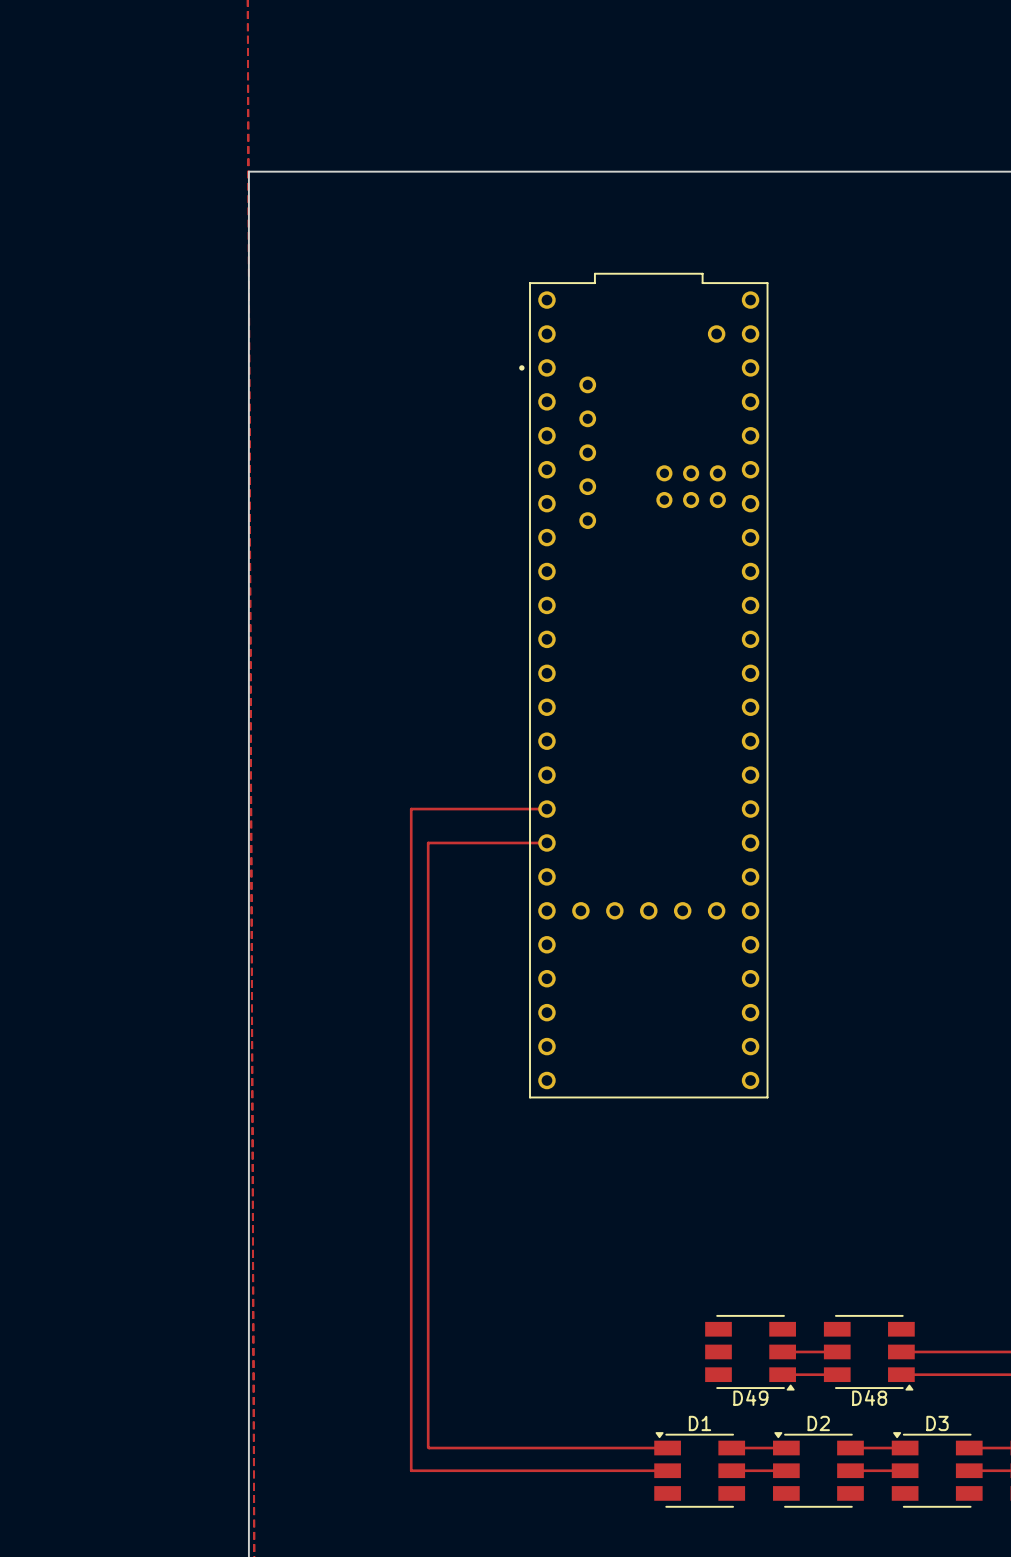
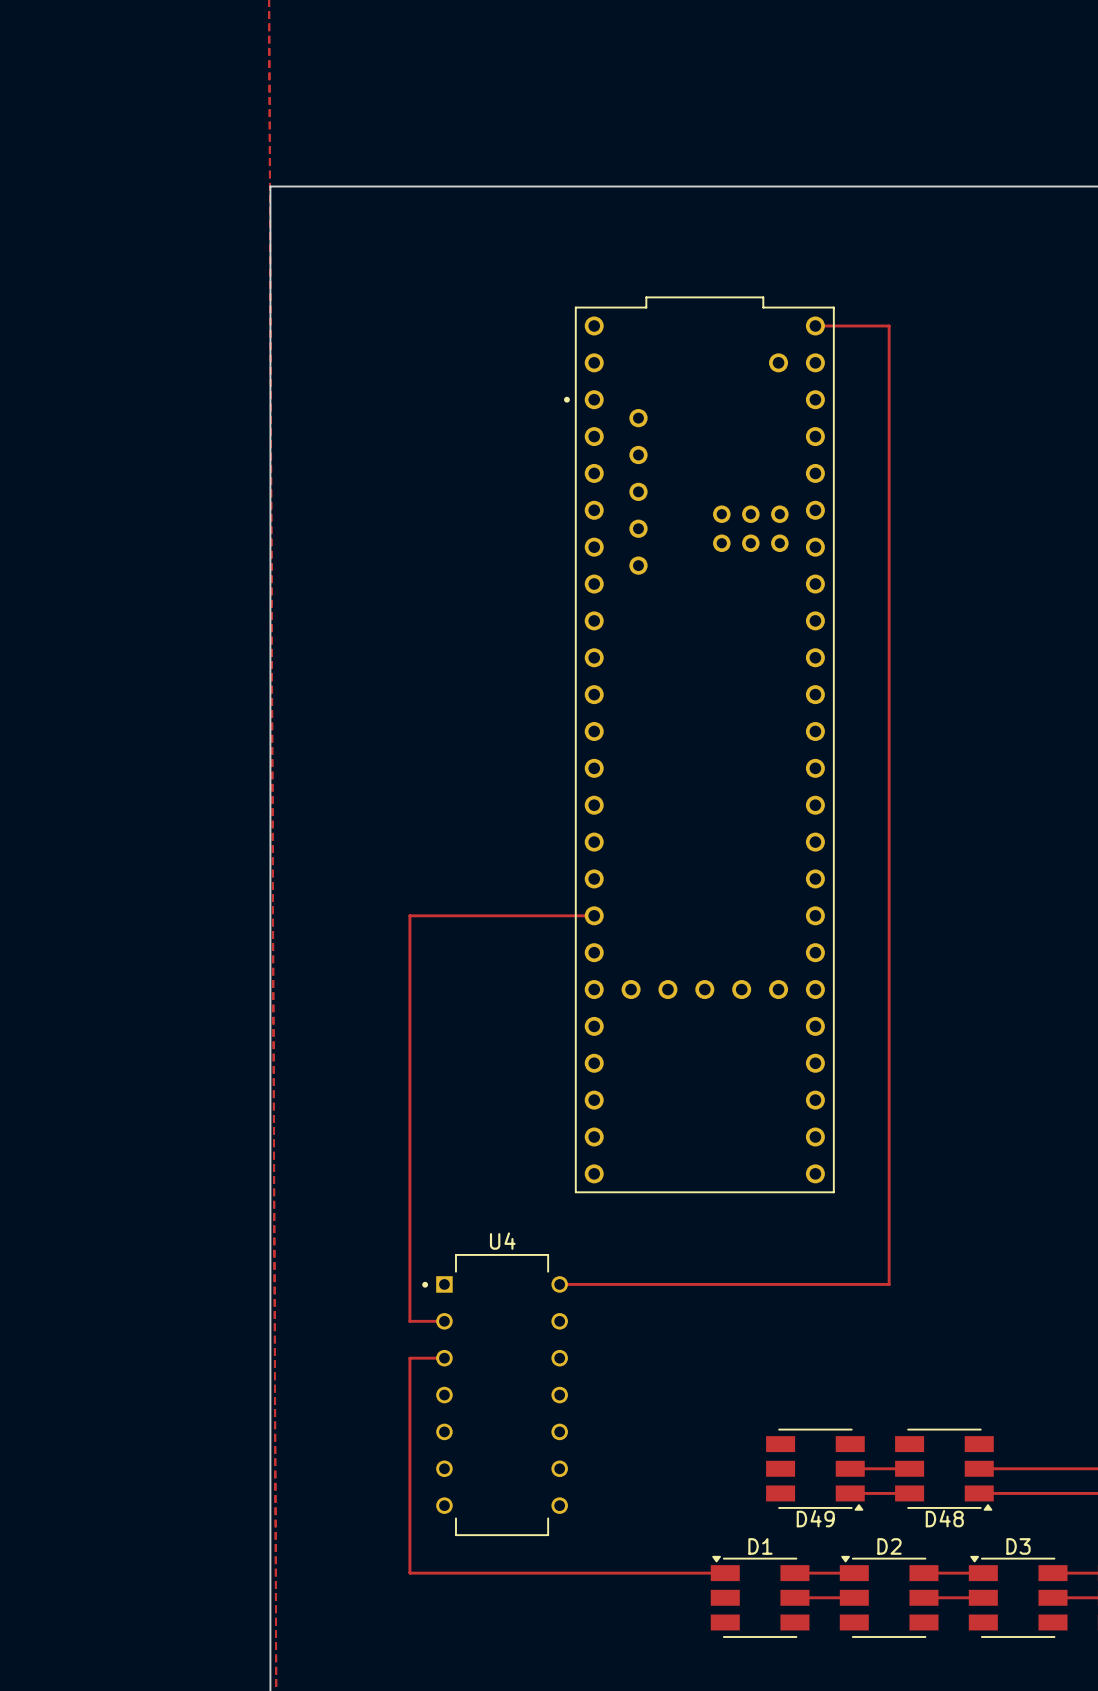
track: none -> (815, 325) (889, 325) (889, 1284) (559, 1284)
track: (546, 809) (411, 809) (411, 1470) (667, 1470) -> none
track: (428, 842) (429, 1448) -> (465, 915) (409, 915) (409, 1321) (444, 1321)
track: none -> (444, 1358) (409, 1358) (409, 1572) (466, 1573)
U4: none -> (495, 1395)

